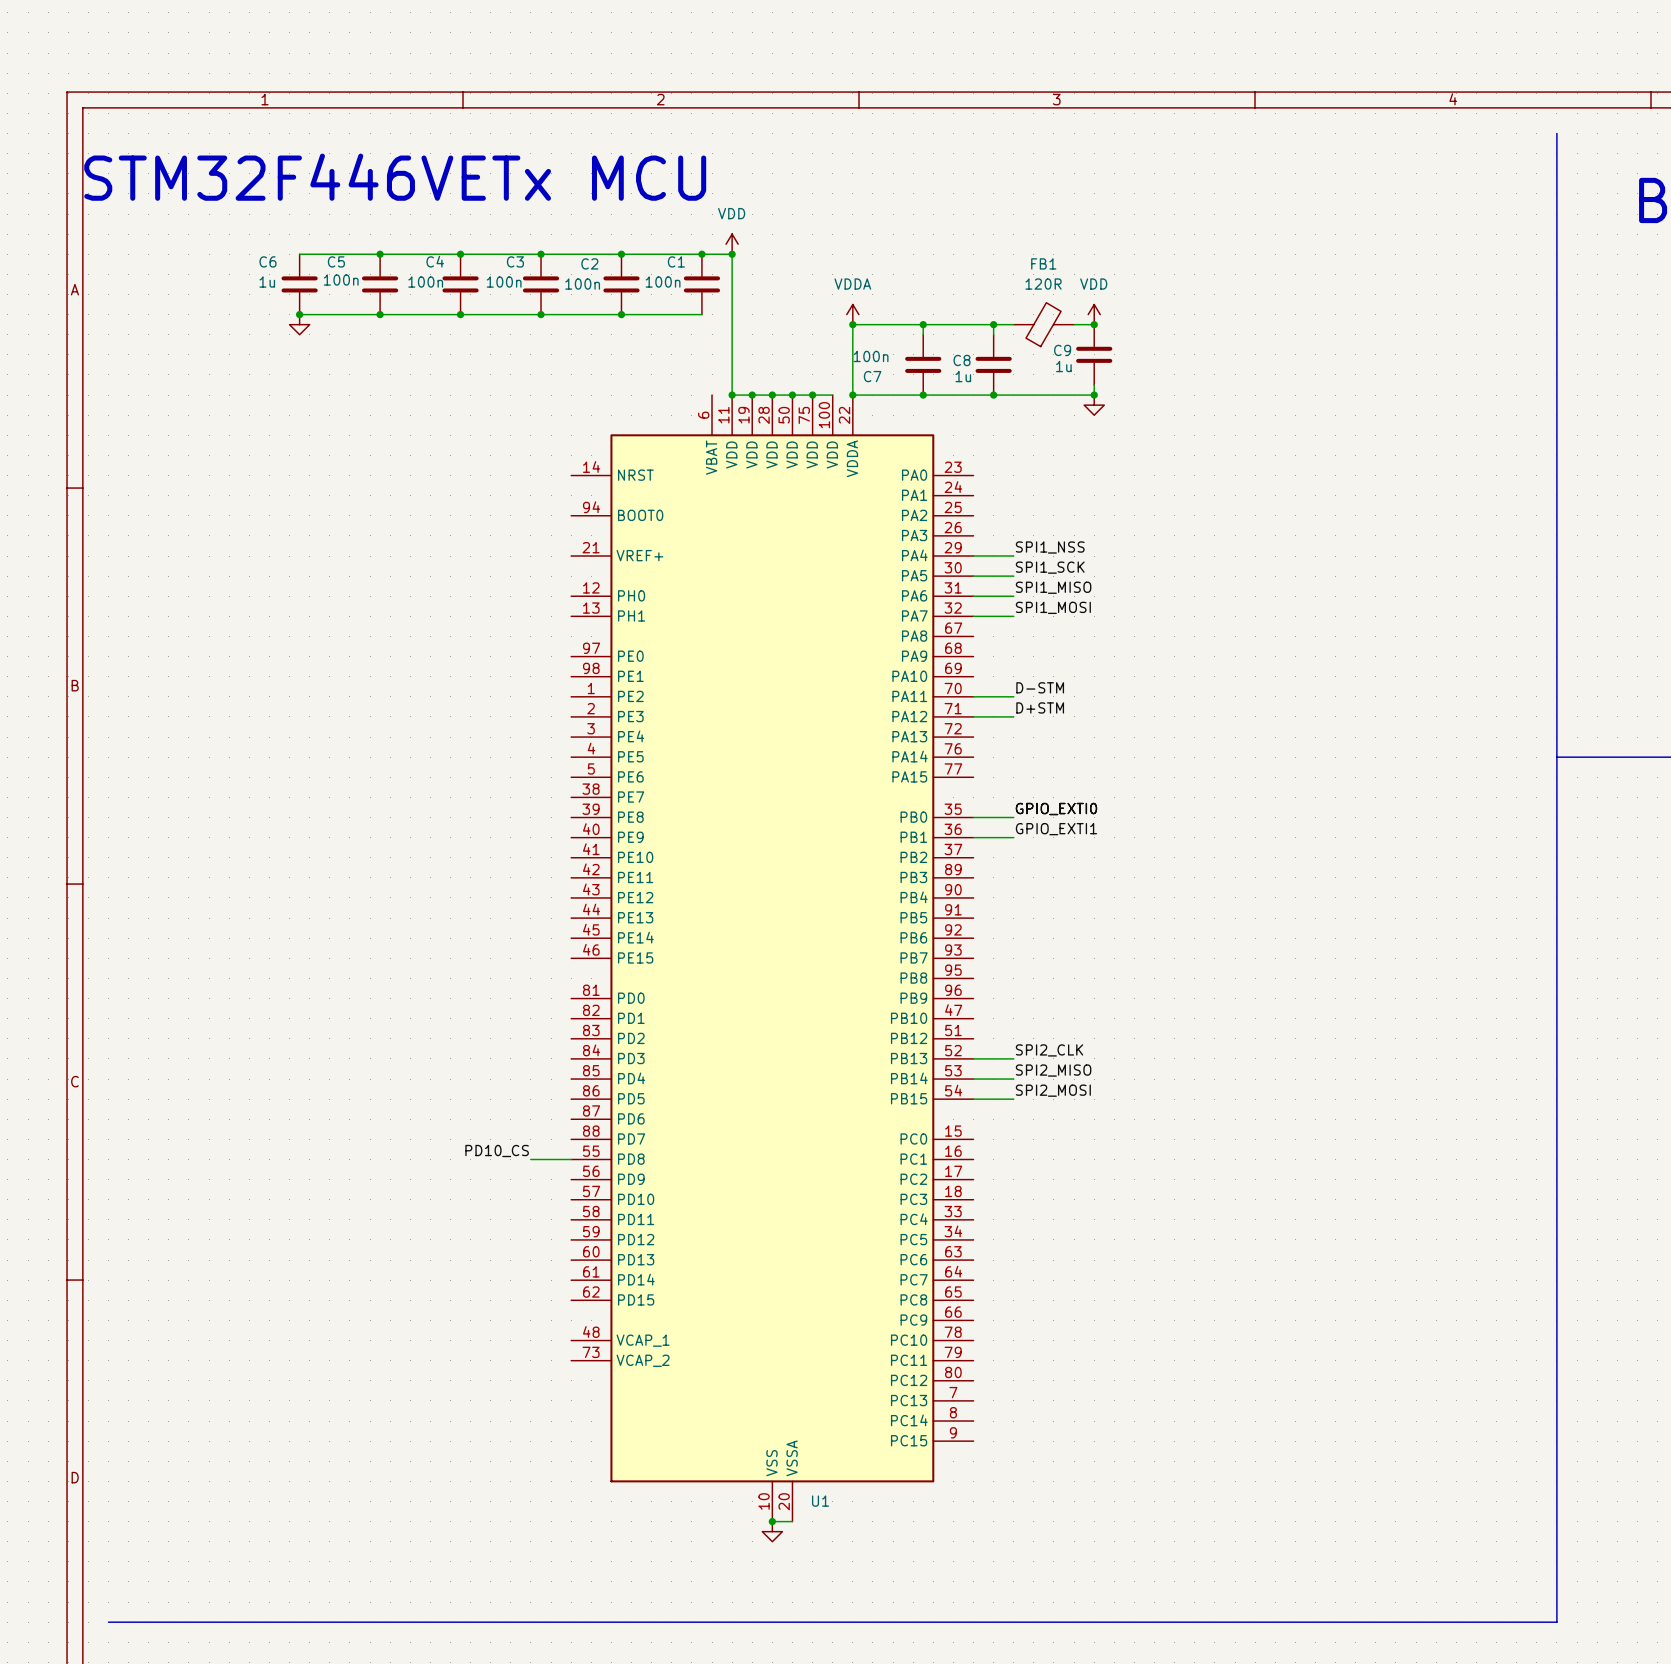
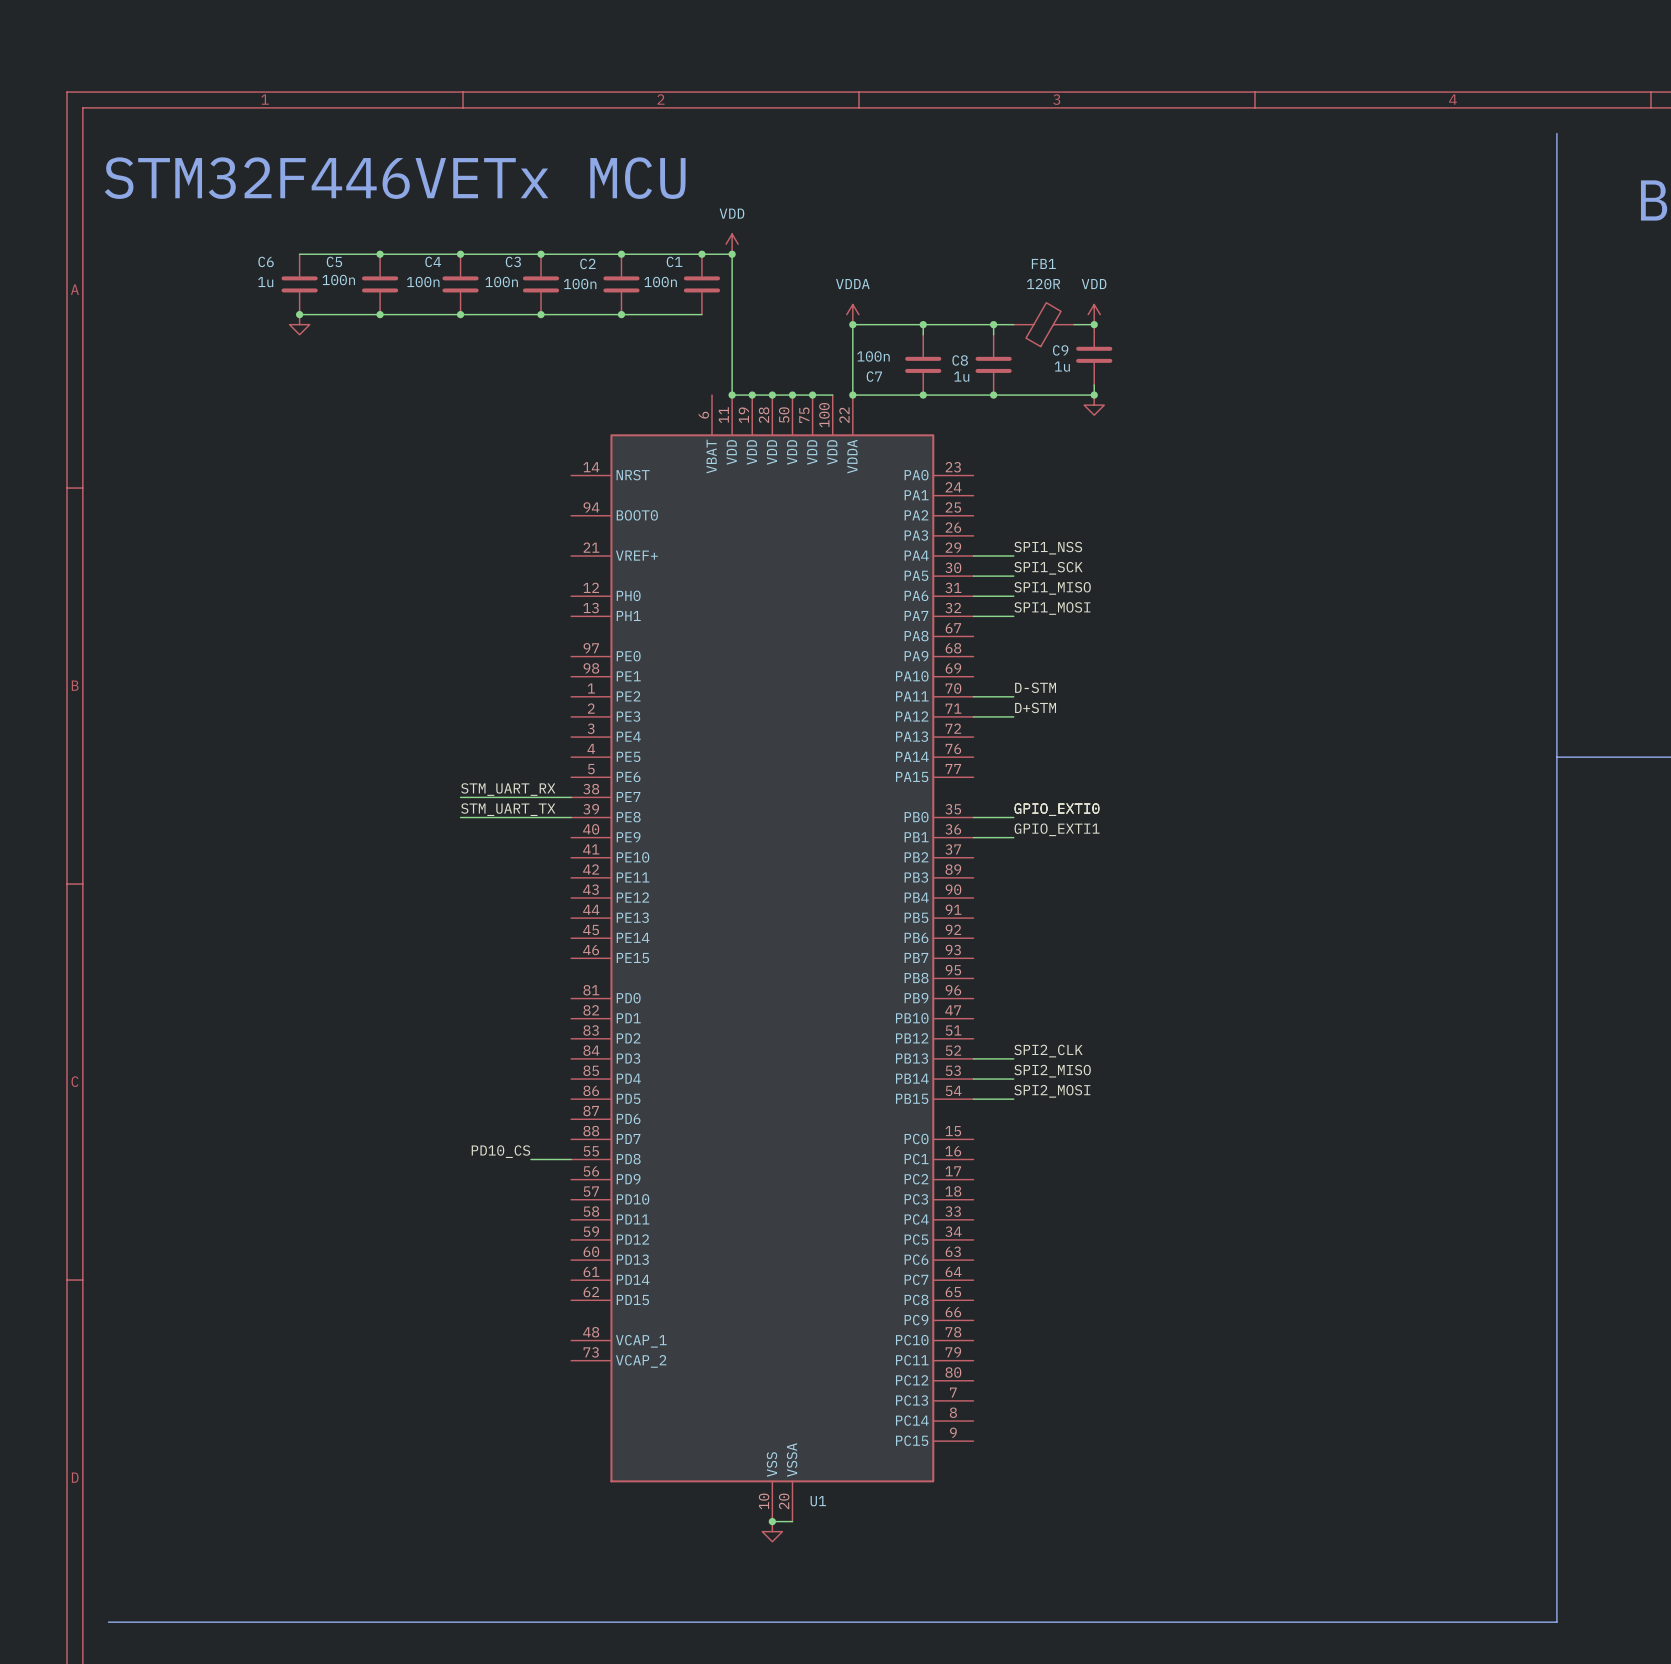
label: none -> STM_UART_RX (508, 789)
wire: none -> (460, 797) (571, 797)
label: none -> STM_UART_TX (508, 809)
wire: none -> (460, 817) (571, 817)

